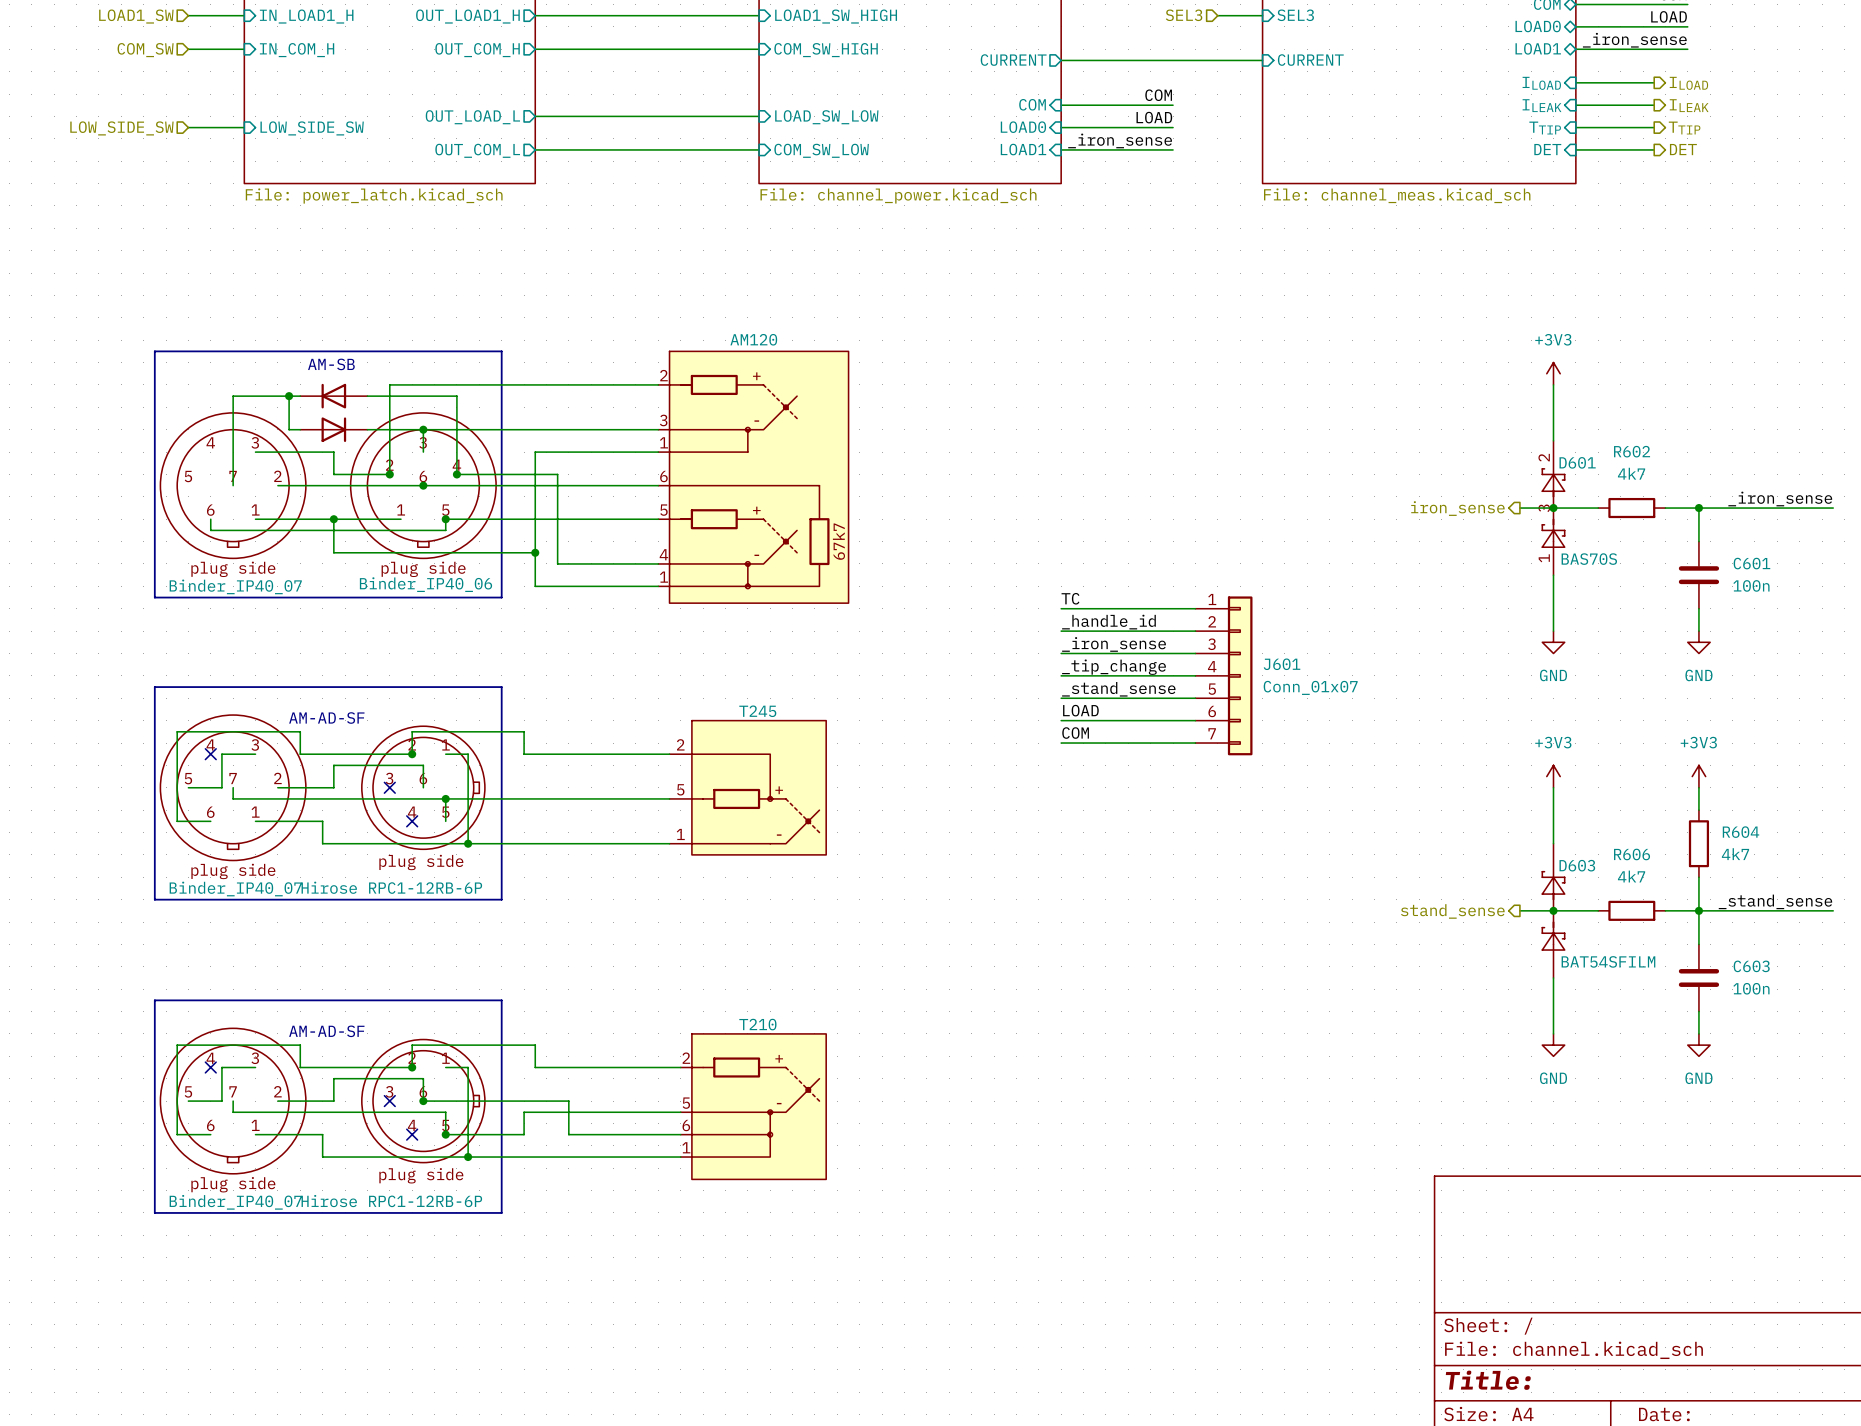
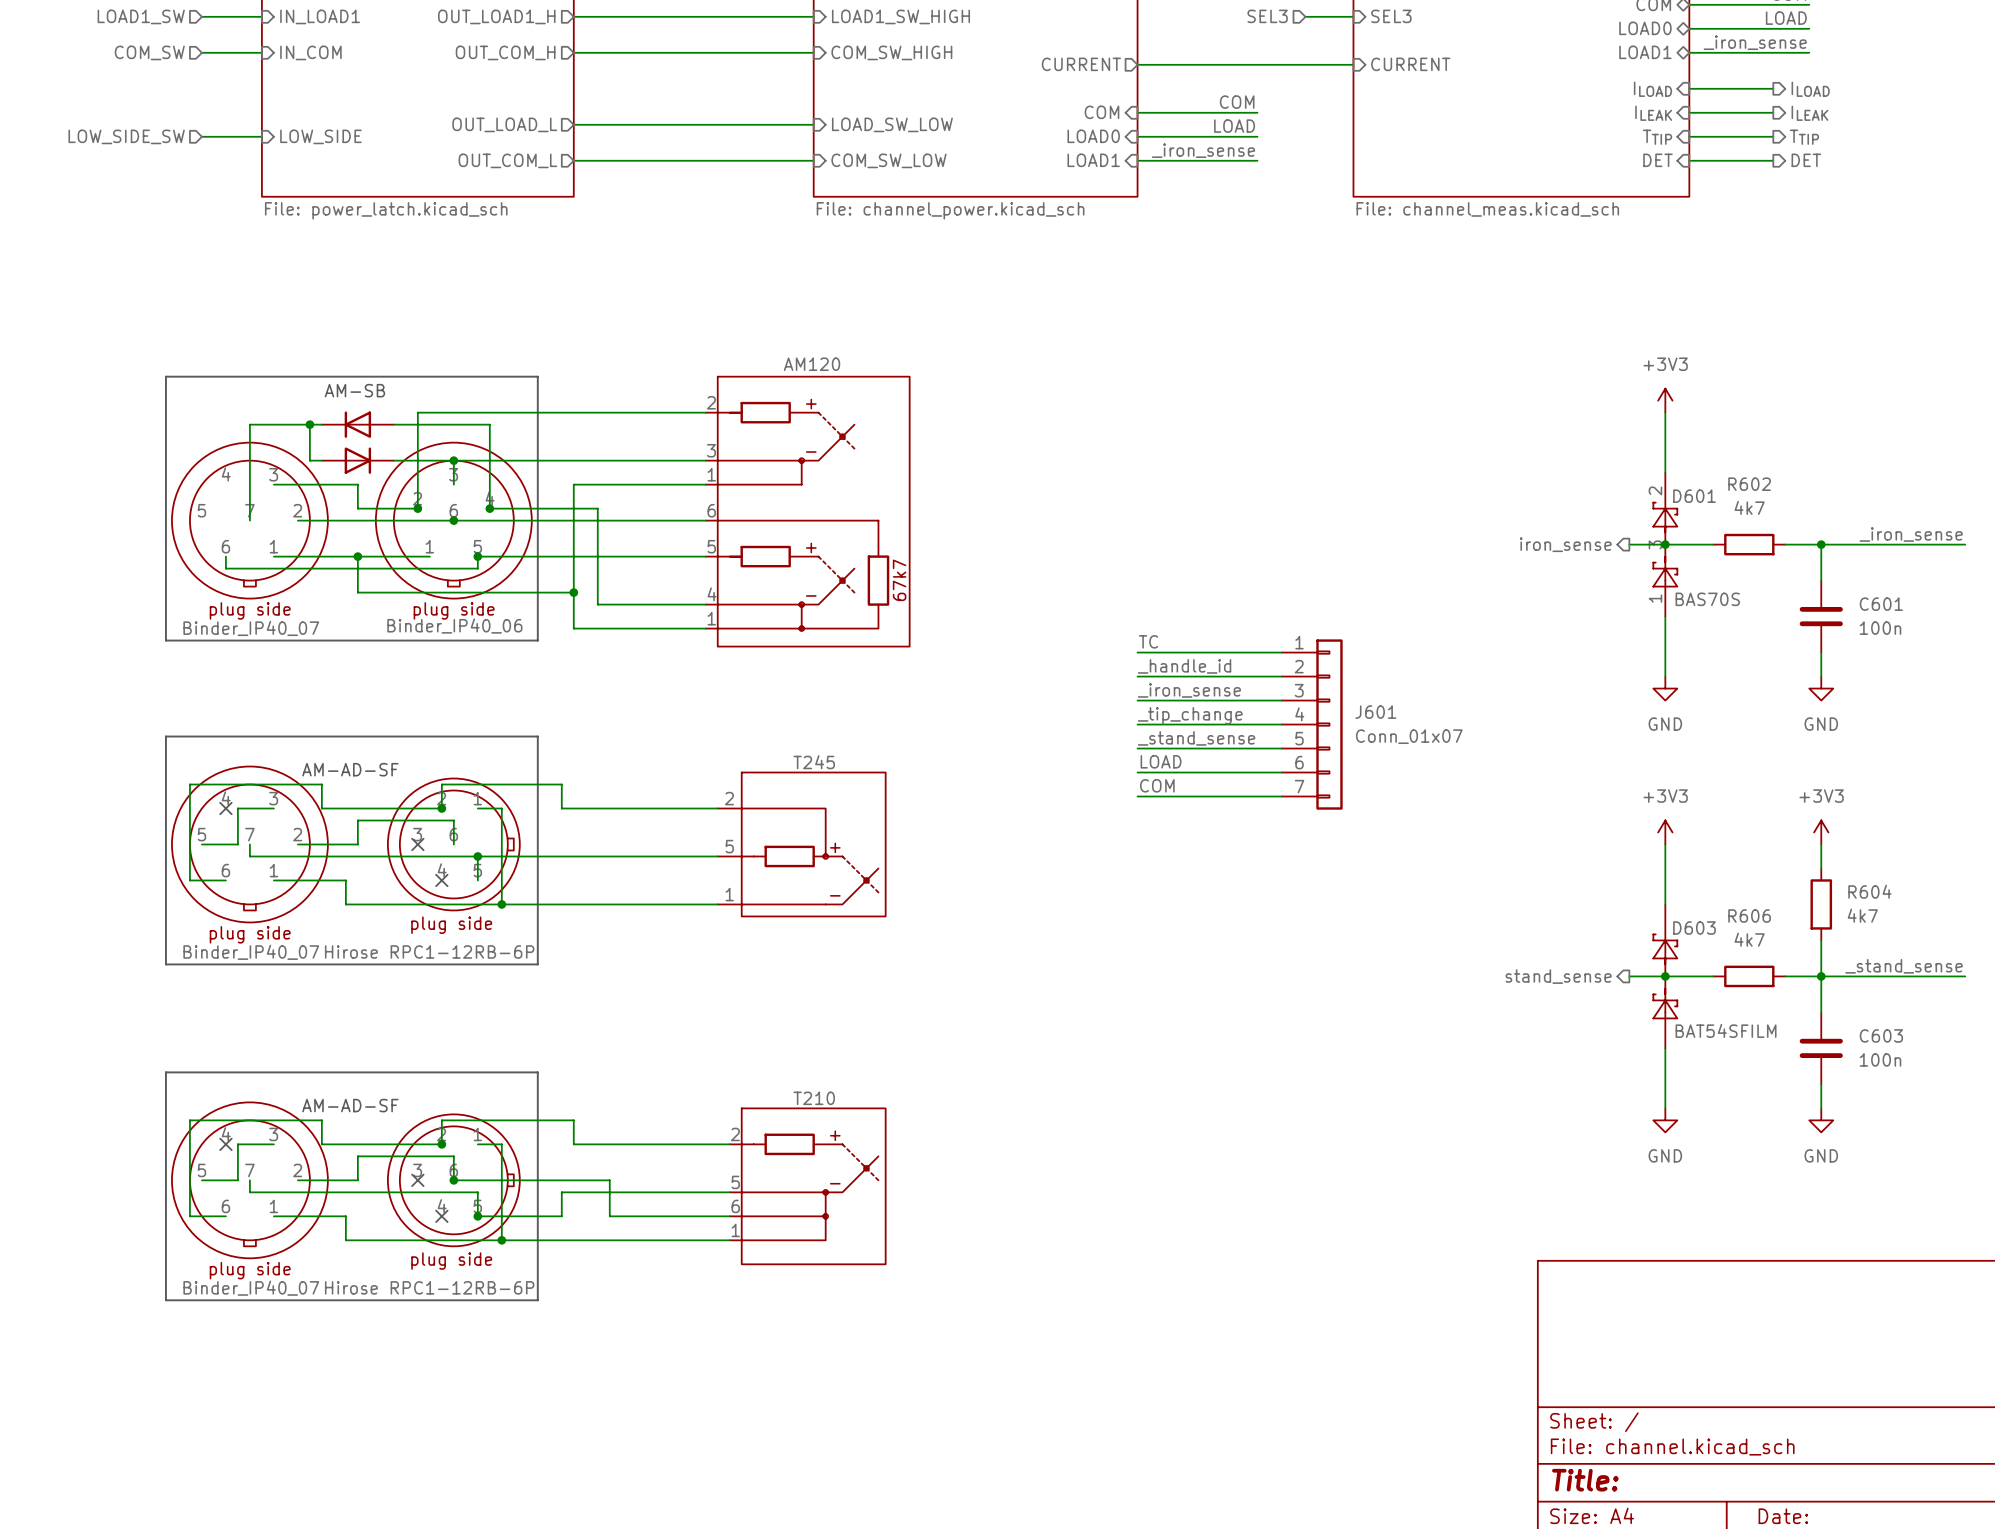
sheet pin: IN_LOAD1_H (306, 16) -> IN_LOAD1 (320, 16)
sheet pin: IN_COM_H (297, 50) -> IN_COM (310, 52)
sheet pin: LOW_SIDE_SW (312, 128) -> LOW_SIDE (320, 136)

